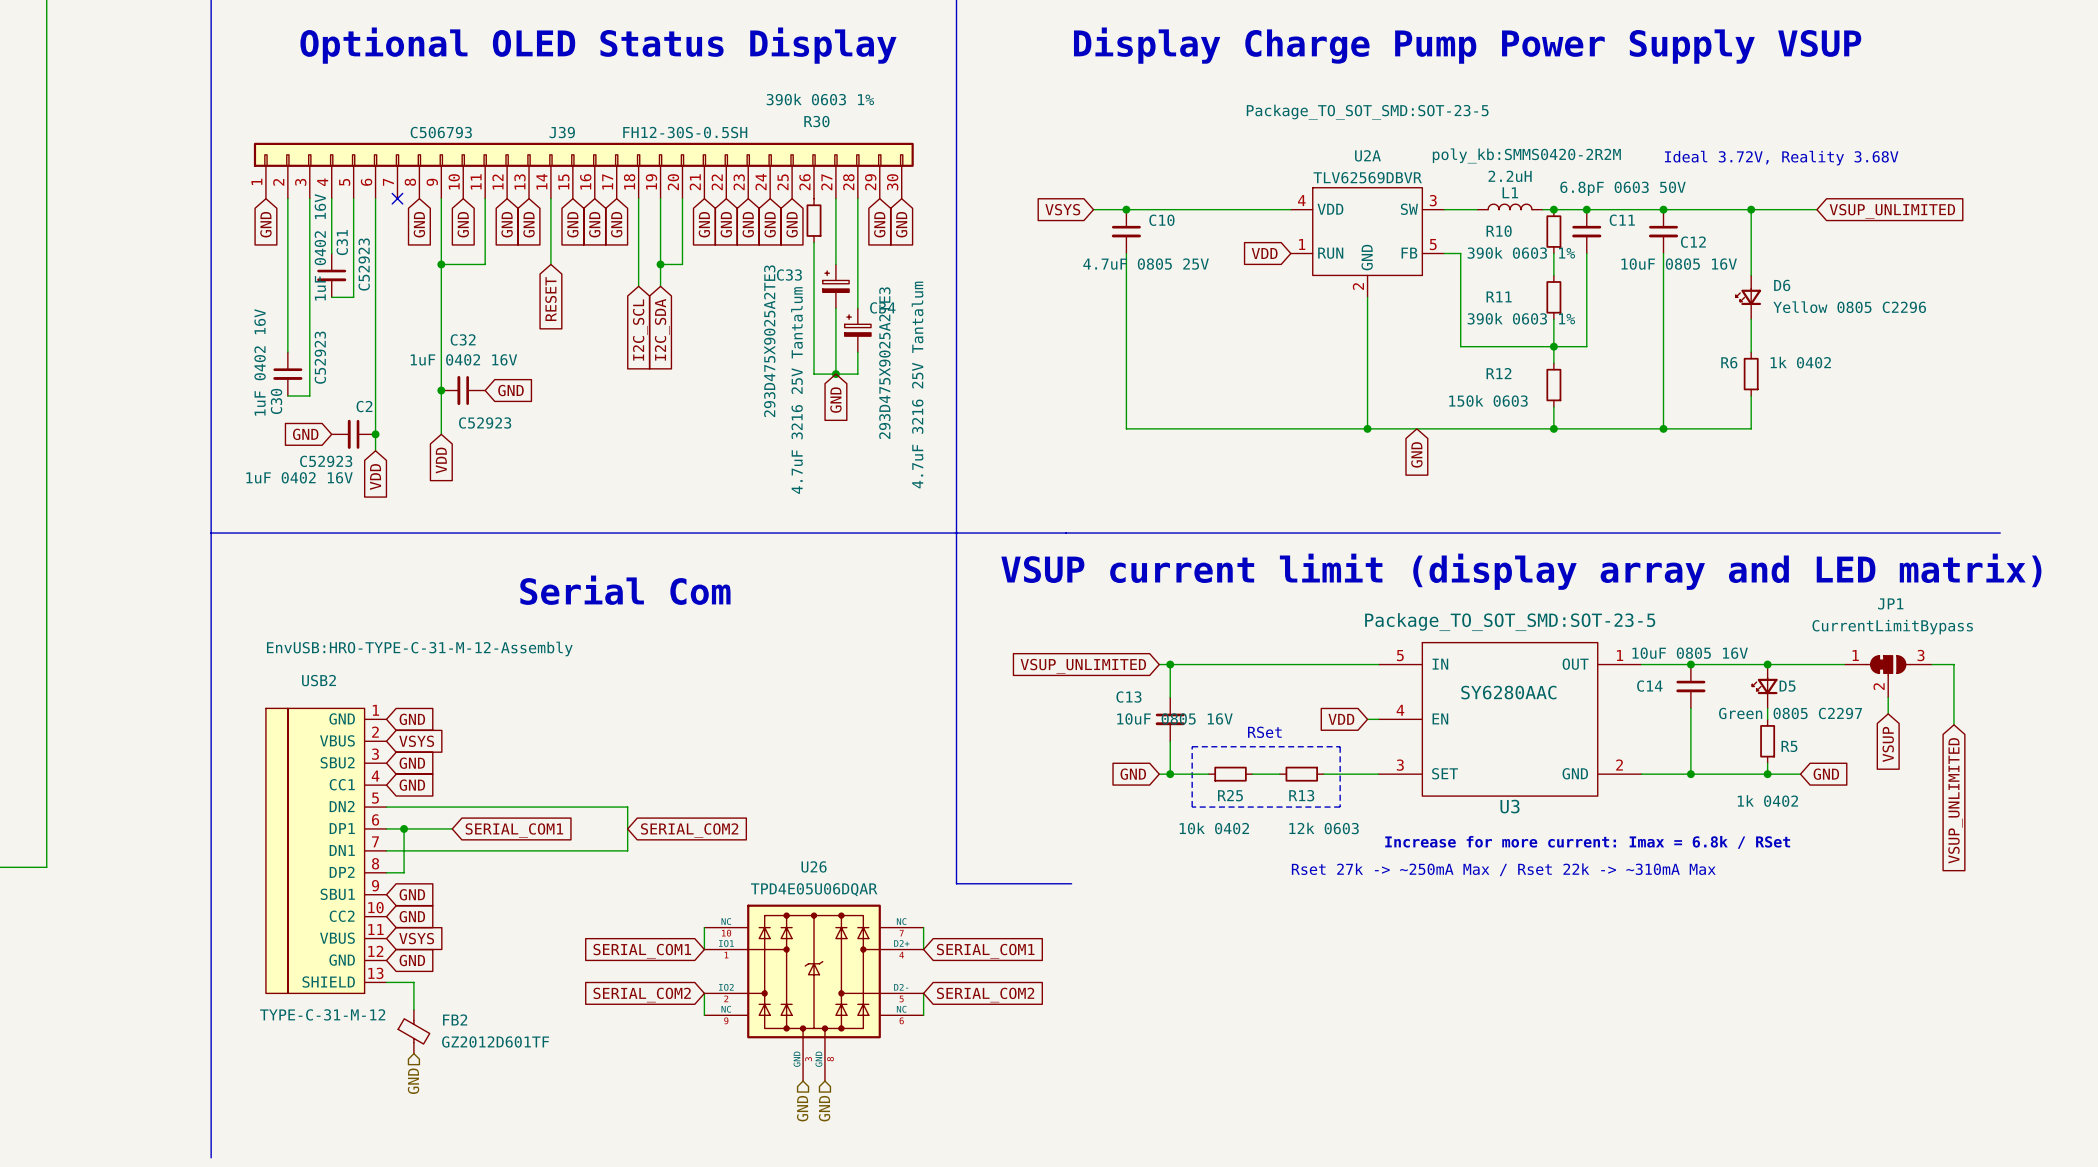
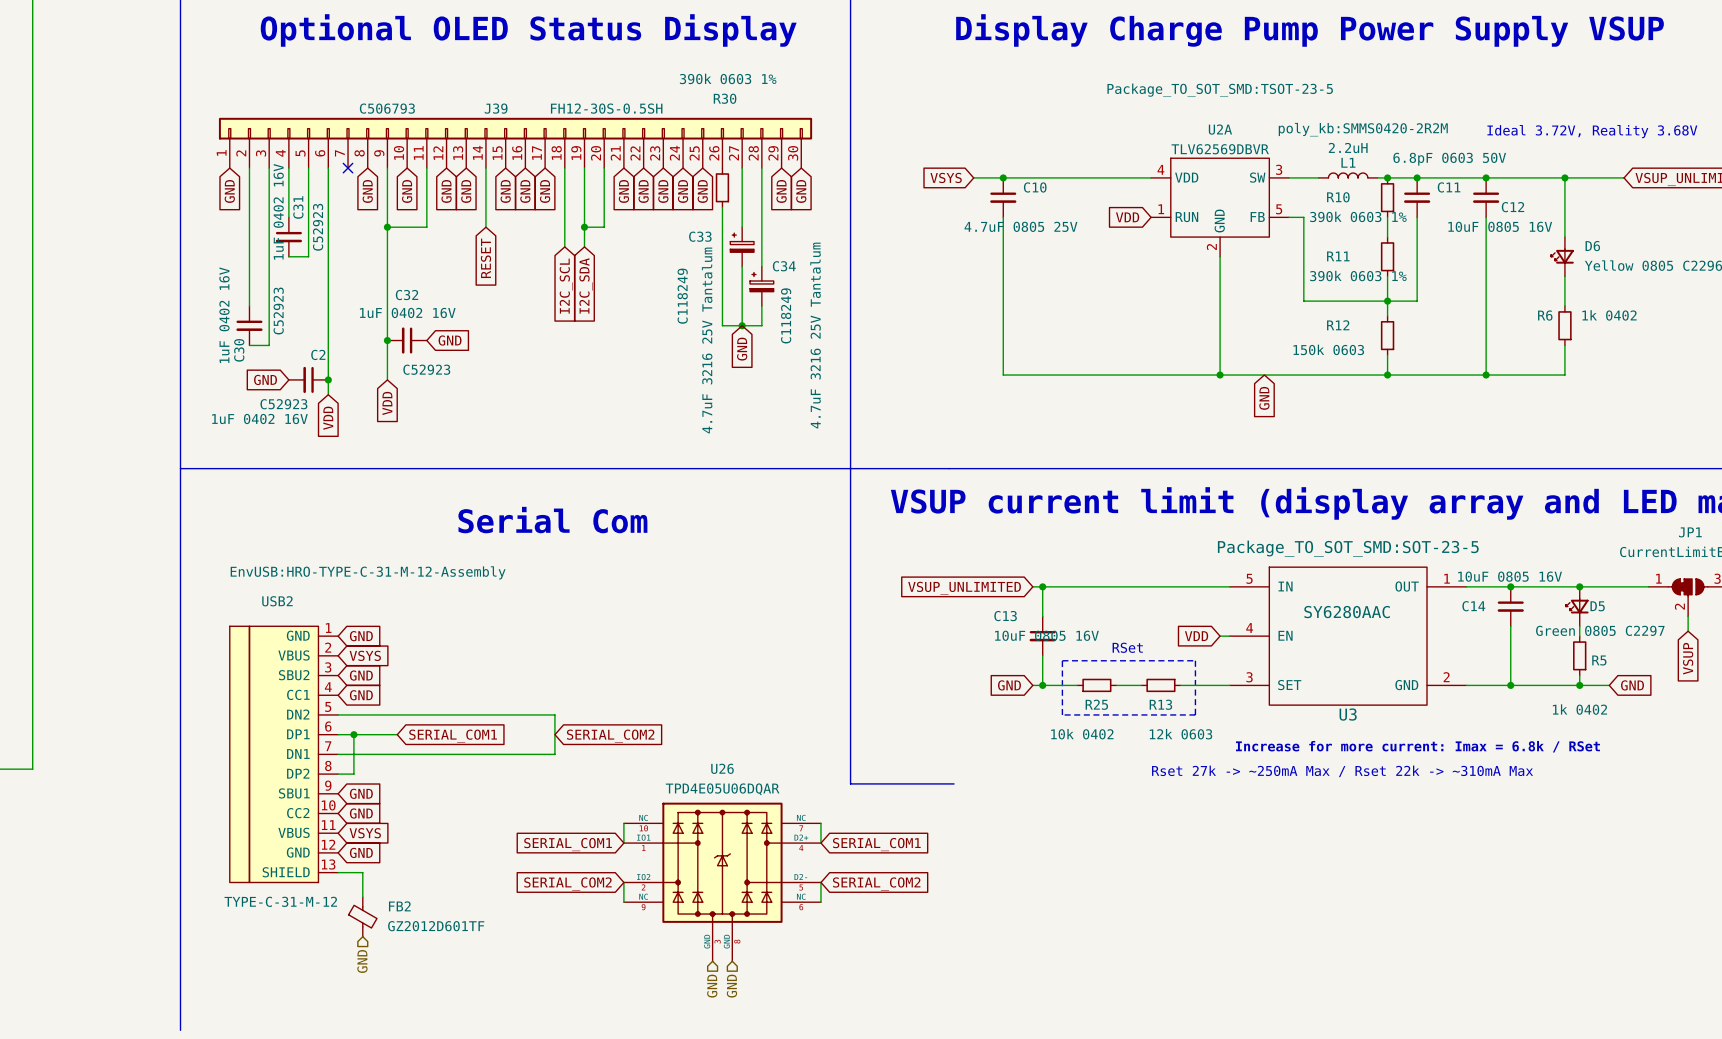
U2A text: Package_TO_SOT_SMD:SOT-23-5 (1367, 112) -> Package_TO_SOT_SMD:TSOT-23-5 (1220, 90)
C33 text: 293D475X9025A2TE3 (769, 341) -> C118249 (682, 296)
C34 text: 293D475X9025A2TE3 (884, 363) -> C118249 (786, 315)

